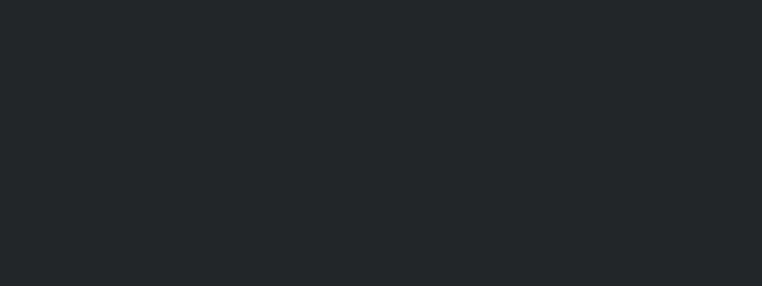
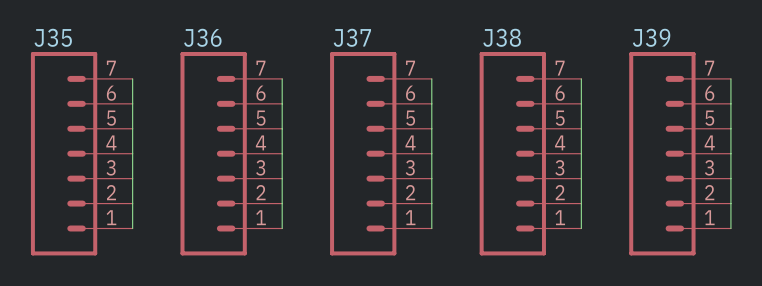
wire: none -> (132, 78) (132, 228)
wire: none -> (282, 78) (282, 228)
wire: none -> (431, 78) (431, 228)
wire: none -> (581, 78) (581, 228)
wire: none -> (730, 78) (730, 228)
J35: none -> (81, 153)
J36: none -> (231, 153)
J37: none -> (380, 153)
J38: none -> (530, 153)
J39: none -> (680, 153)

